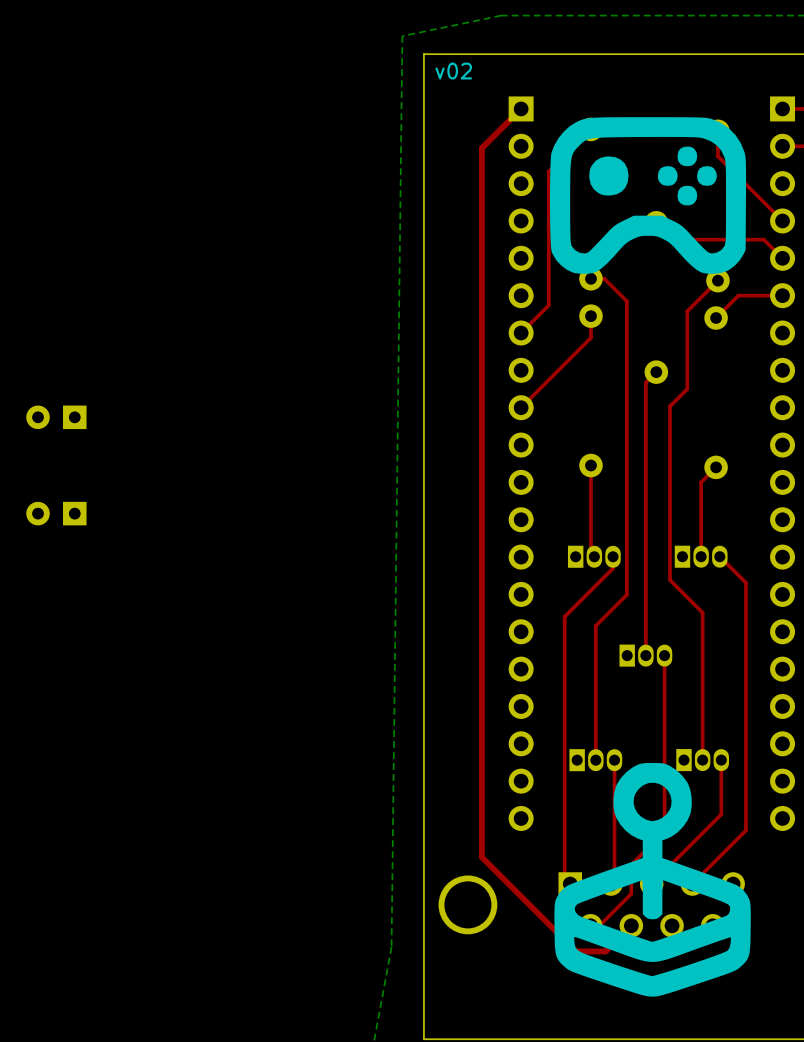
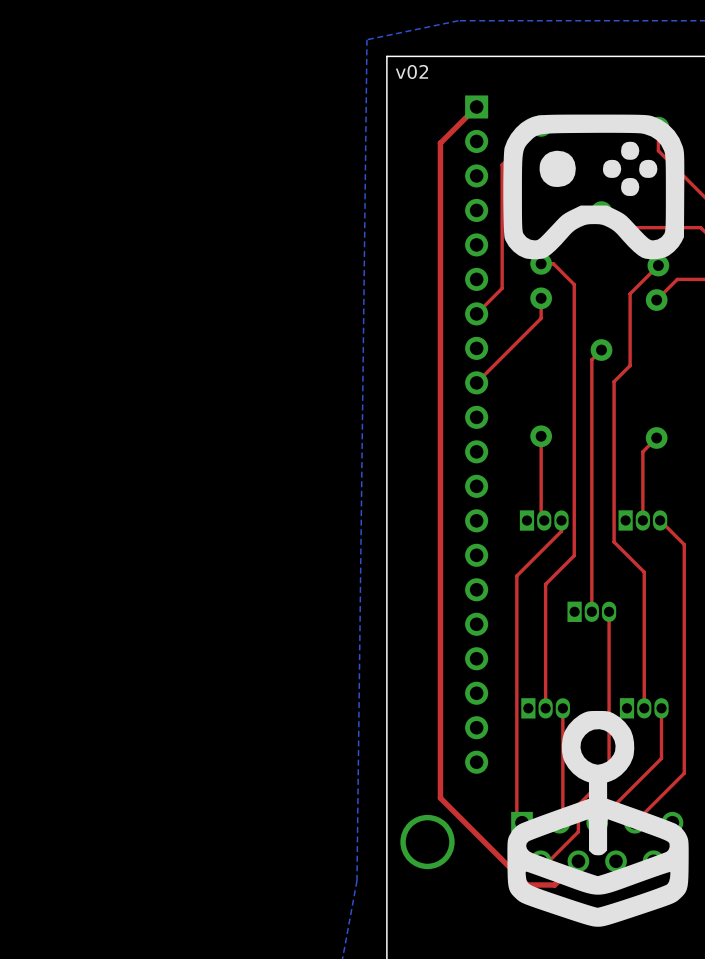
part: (56, 417) -> none
part: (56, 513) -> none

